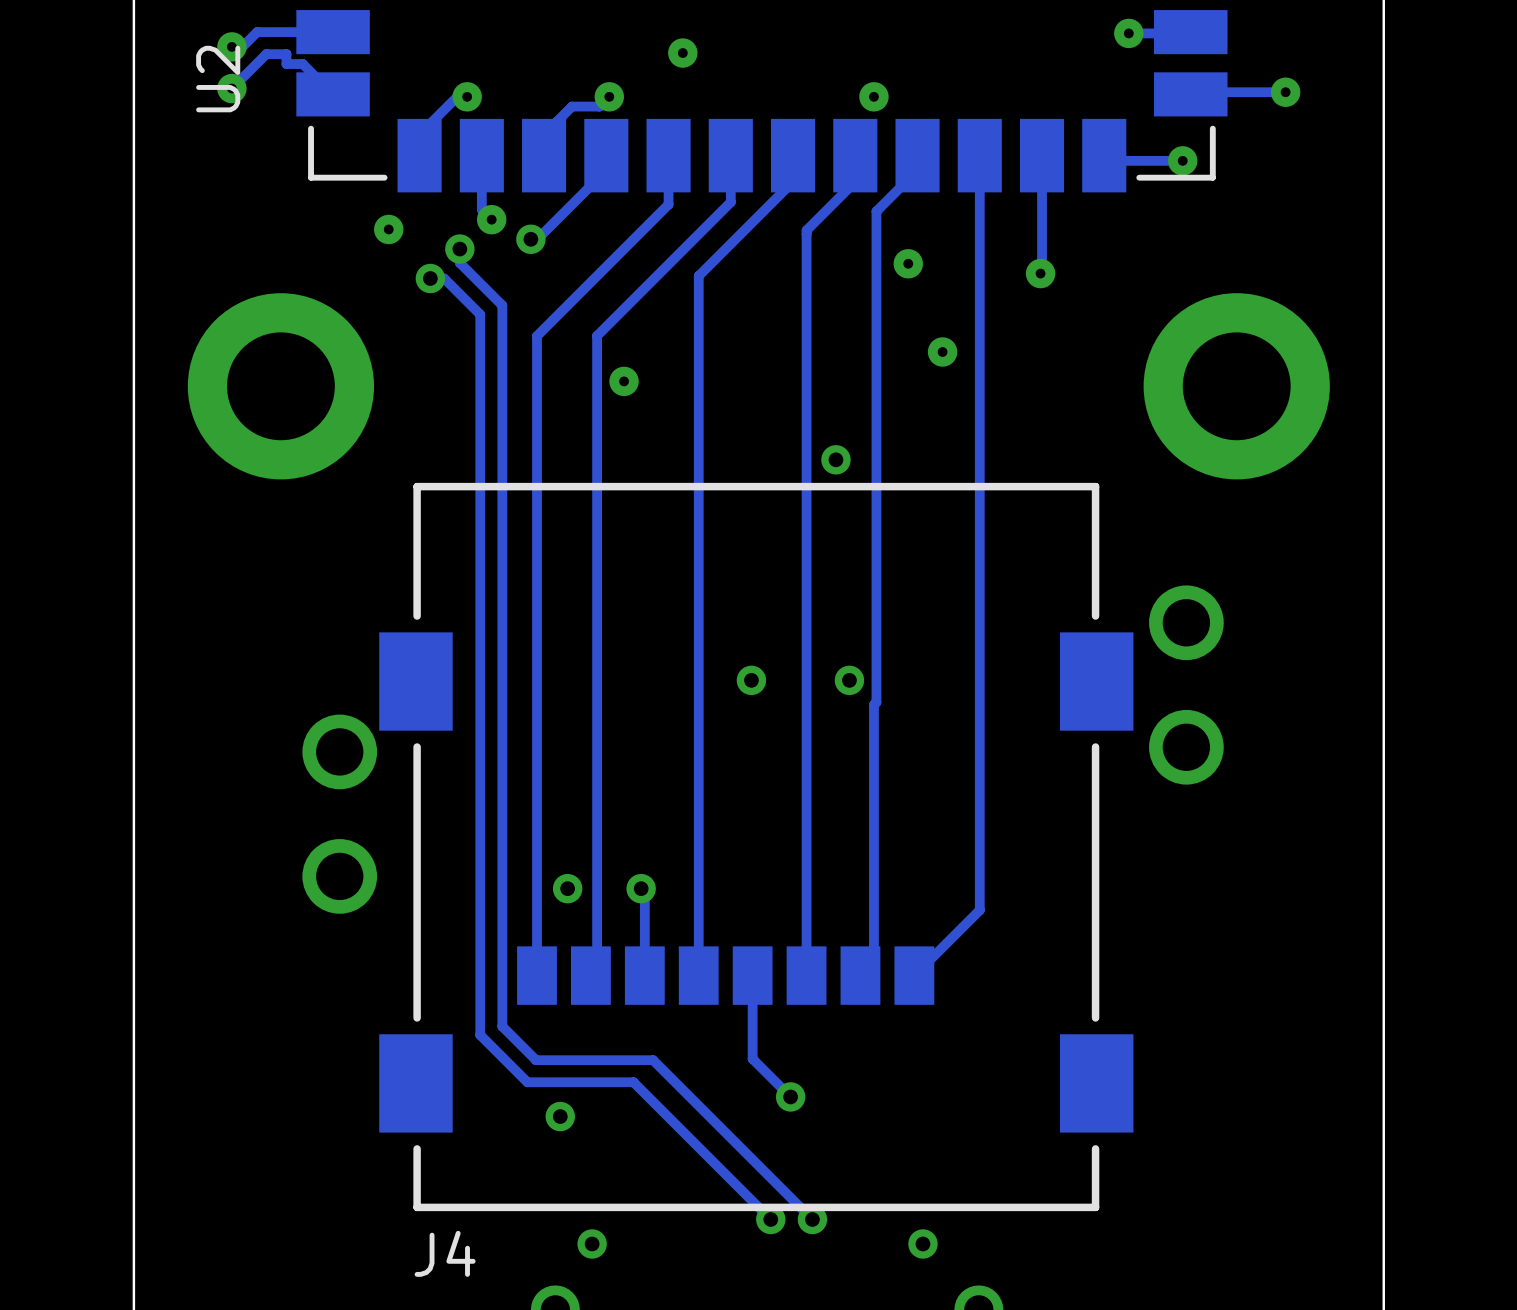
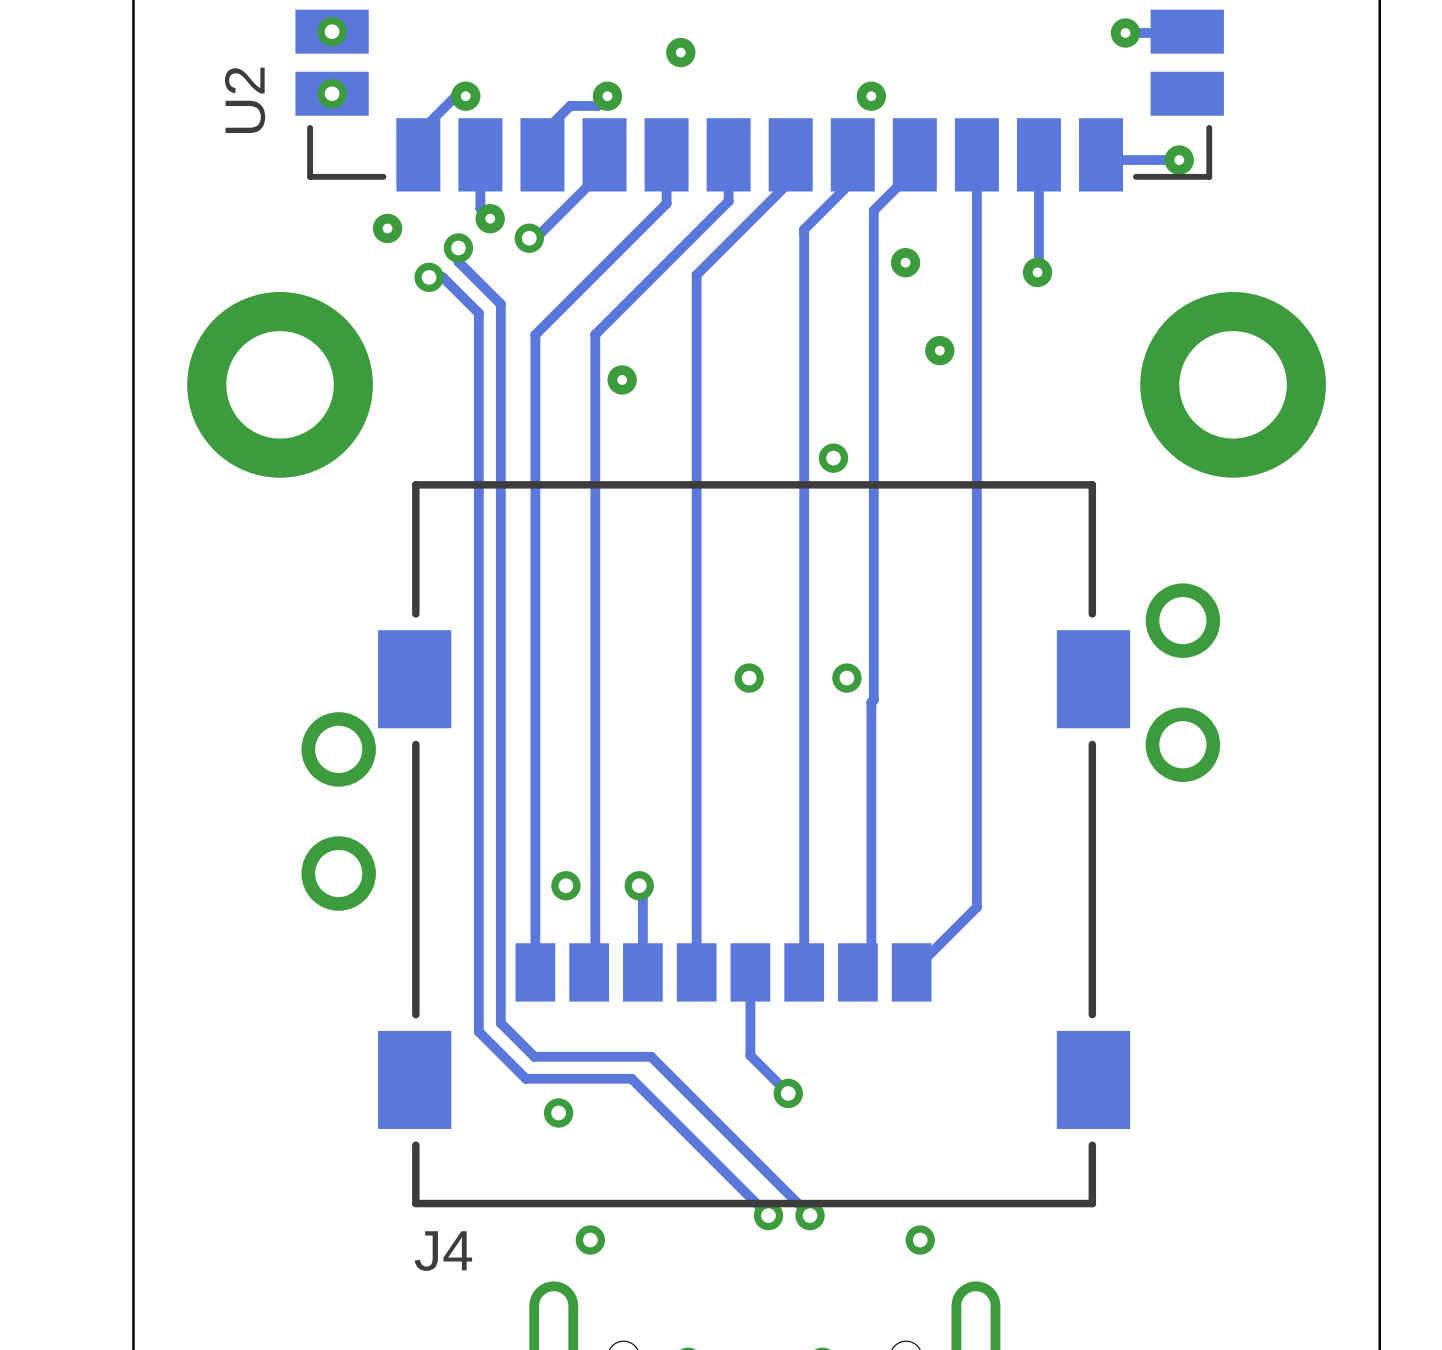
track: (333, 32) (257, 32) (242, 46) (231, 46) -> none
via: none -> (332, 31)
via: (231, 46) -> none
U2 name position: U2 (218, 79) -> U2 (245, 100)
track: (231, 88) (266, 54) (286, 54) (286, 64) (302, 64) (333, 94) -> none
via: (231, 88) -> none
track: (1285, 92) (1192, 92) (1190, 94) -> none
via: (1285, 92) -> none
via: none -> (332, 93)

